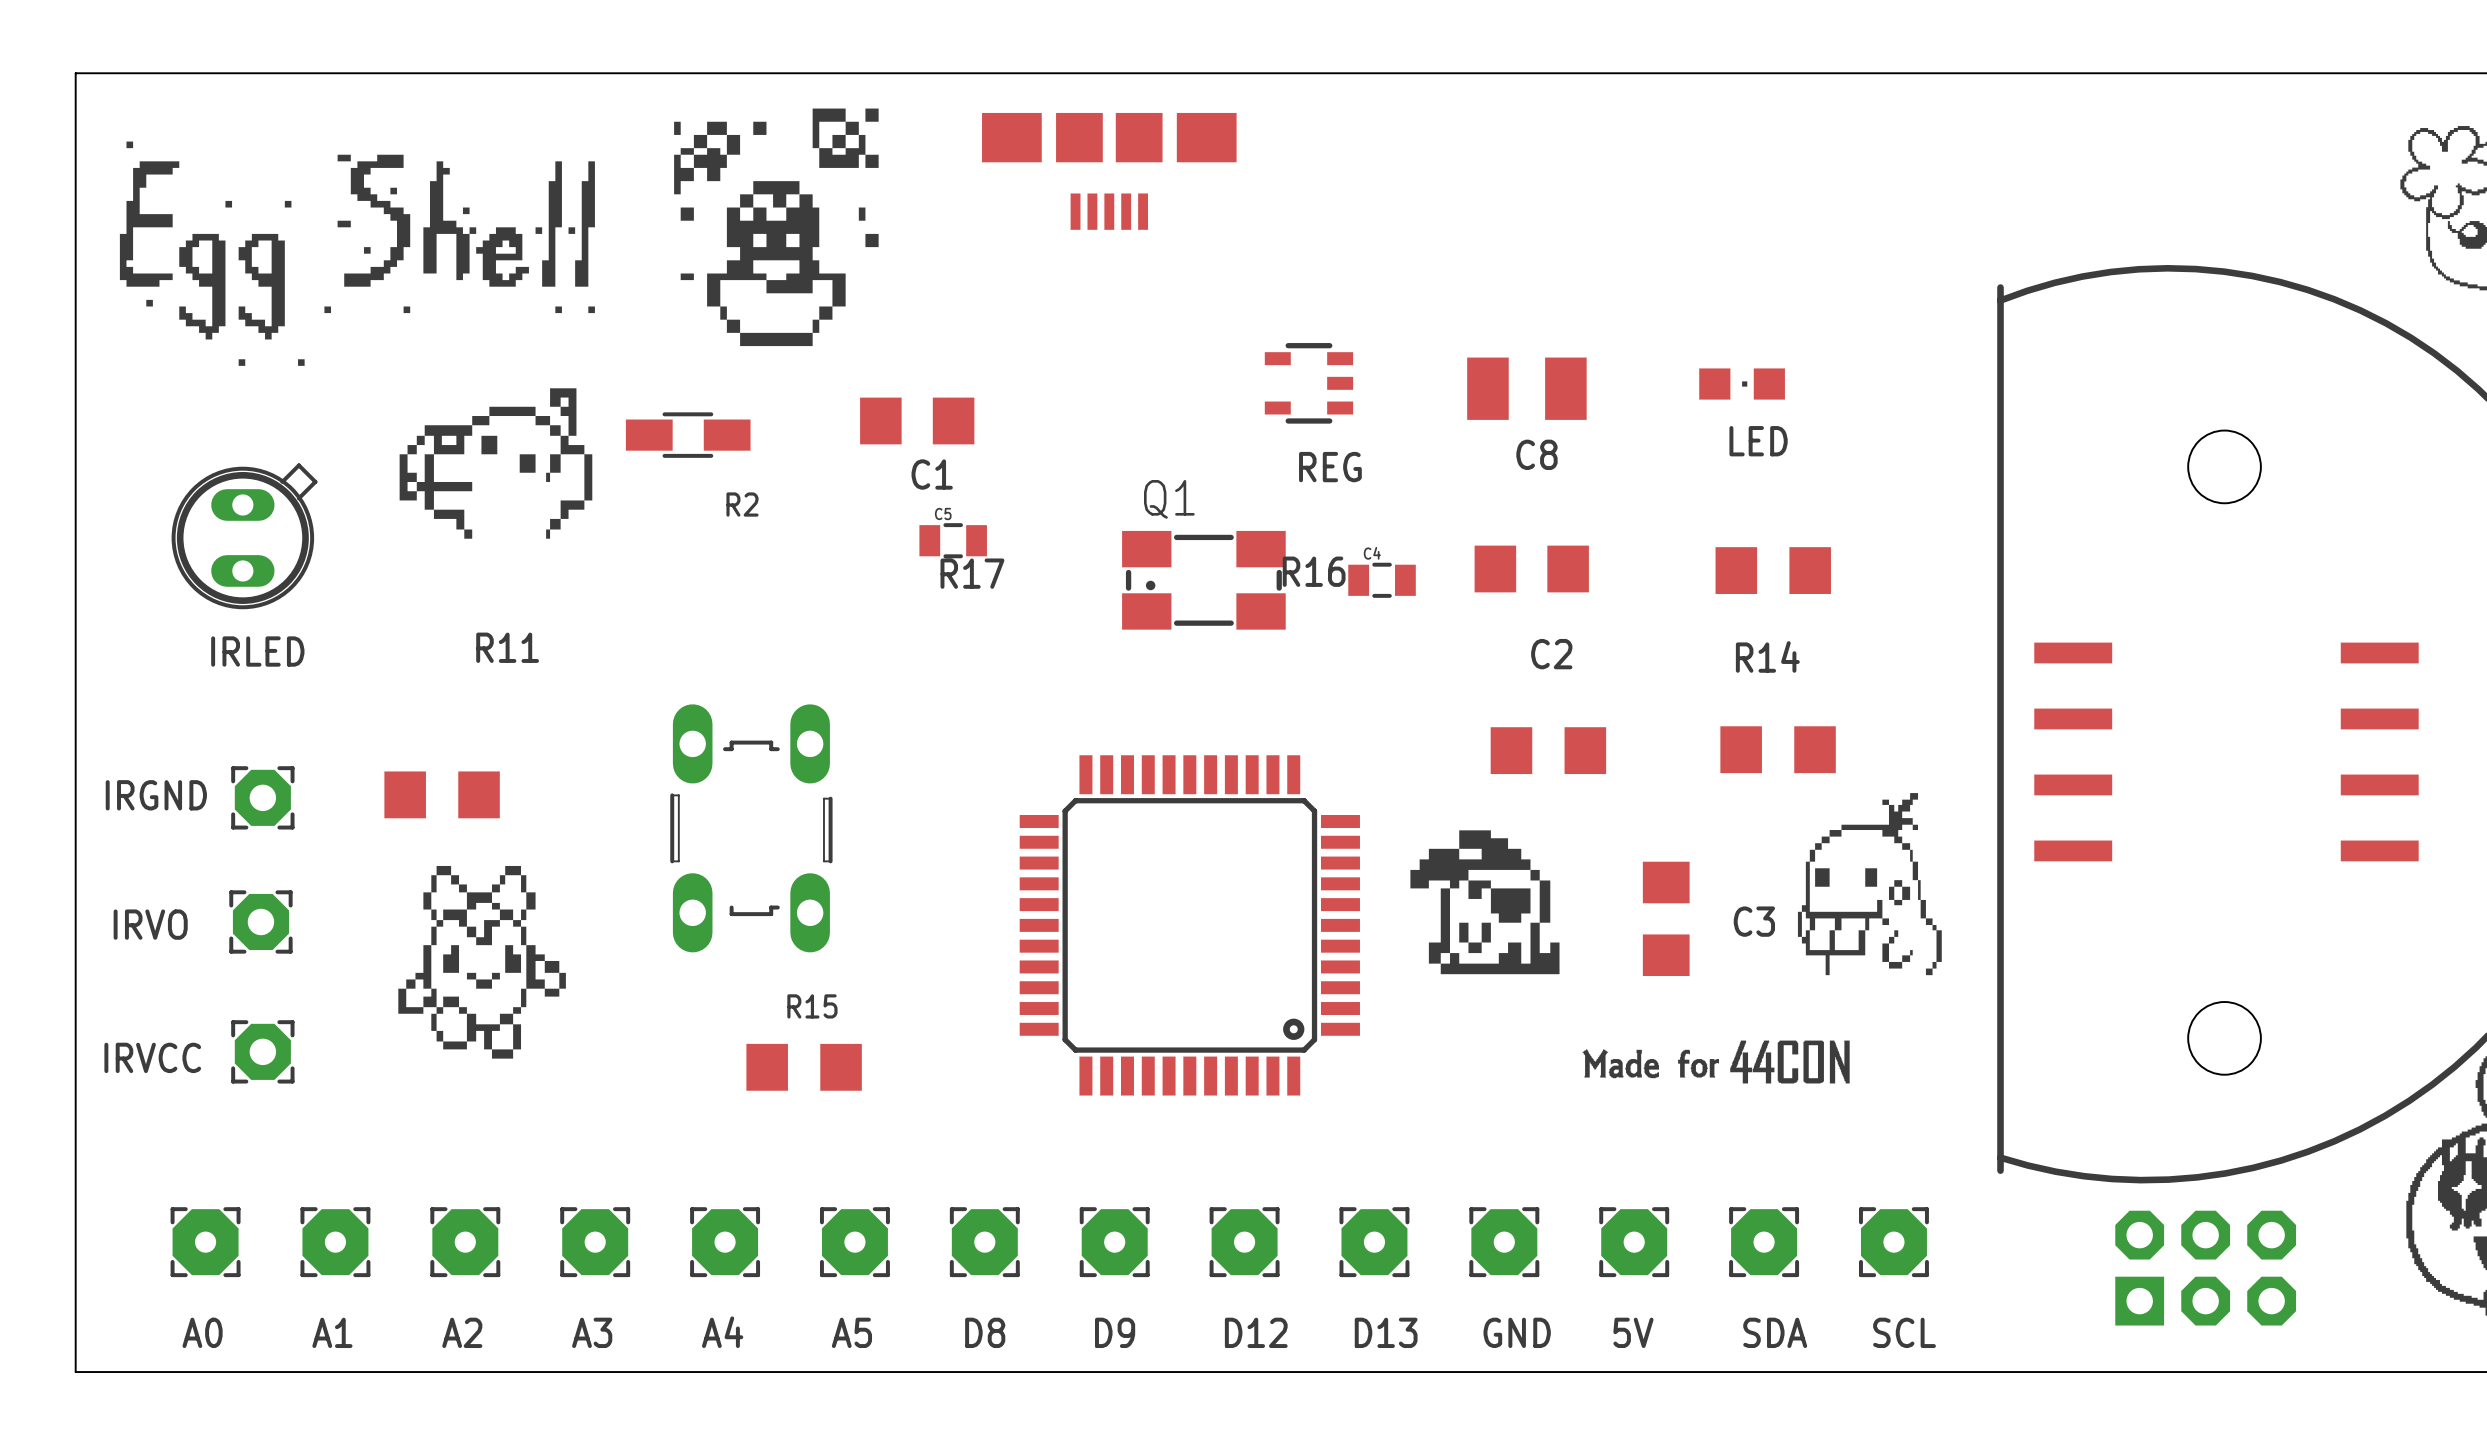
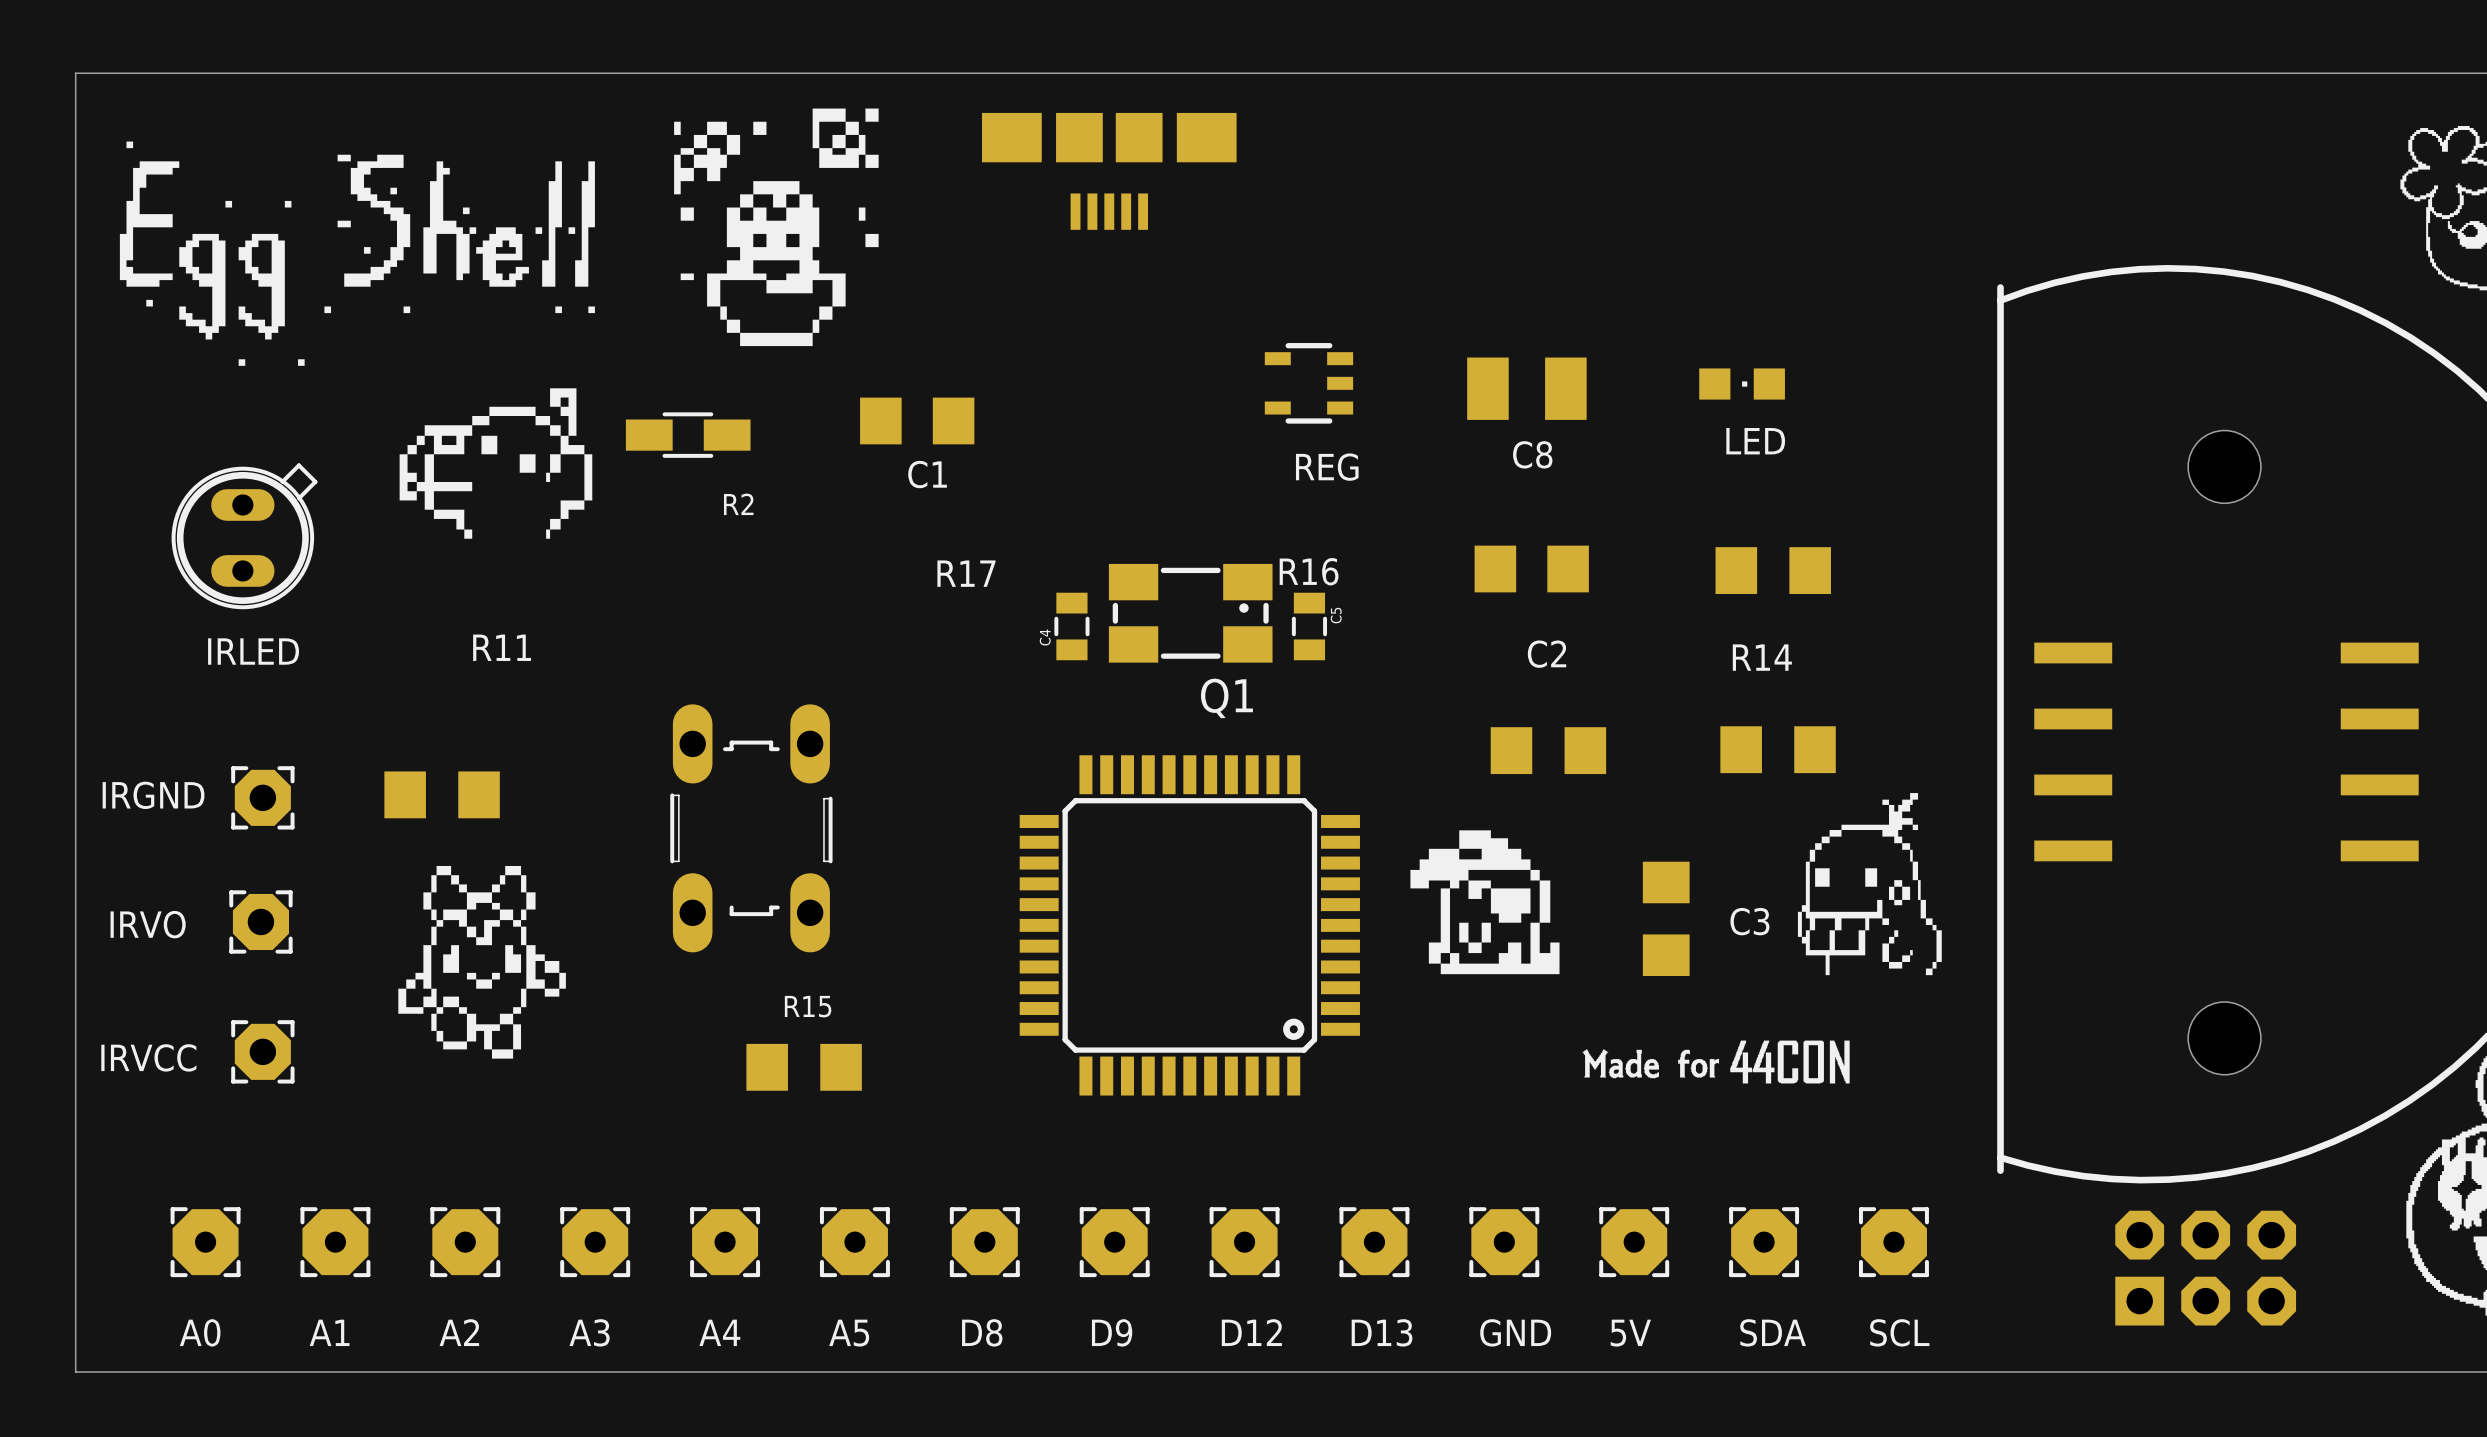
C5 rotation: 0° (953, 540) -> 90° clockwise (1309, 626)
C5 position: (953, 540) -> (1309, 626)
Q1 rotation: 0° (1203, 580) -> 180° (1190, 613)
C4 rotation: 0° (1382, 580) -> 90° clockwise (1071, 626)
C4 position: (1382, 580) -> (1071, 626)

